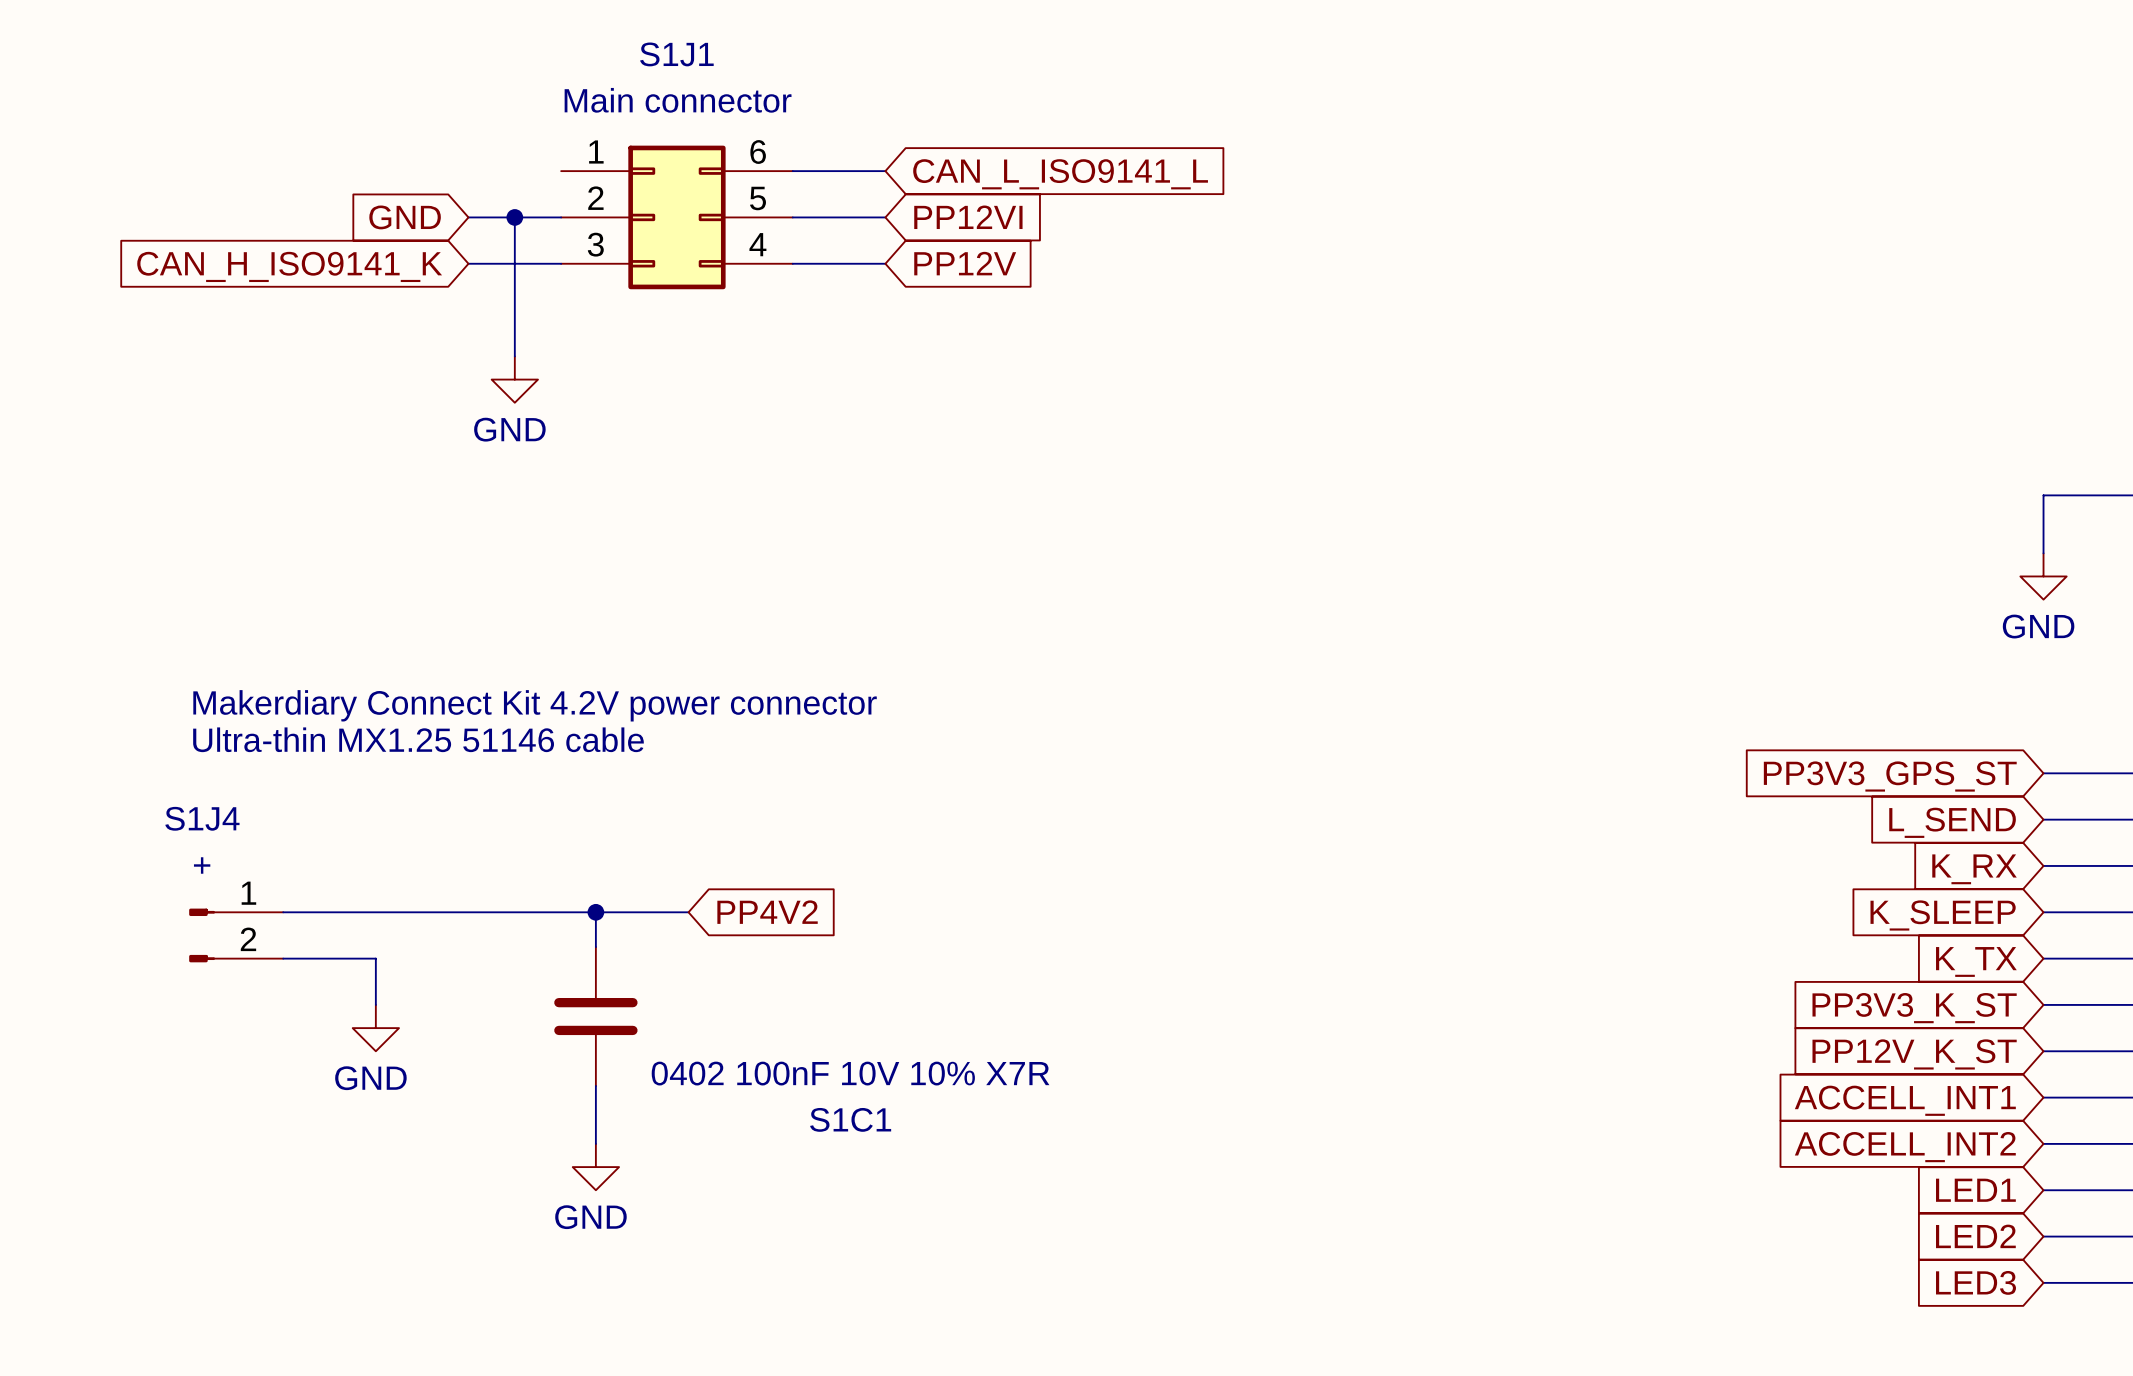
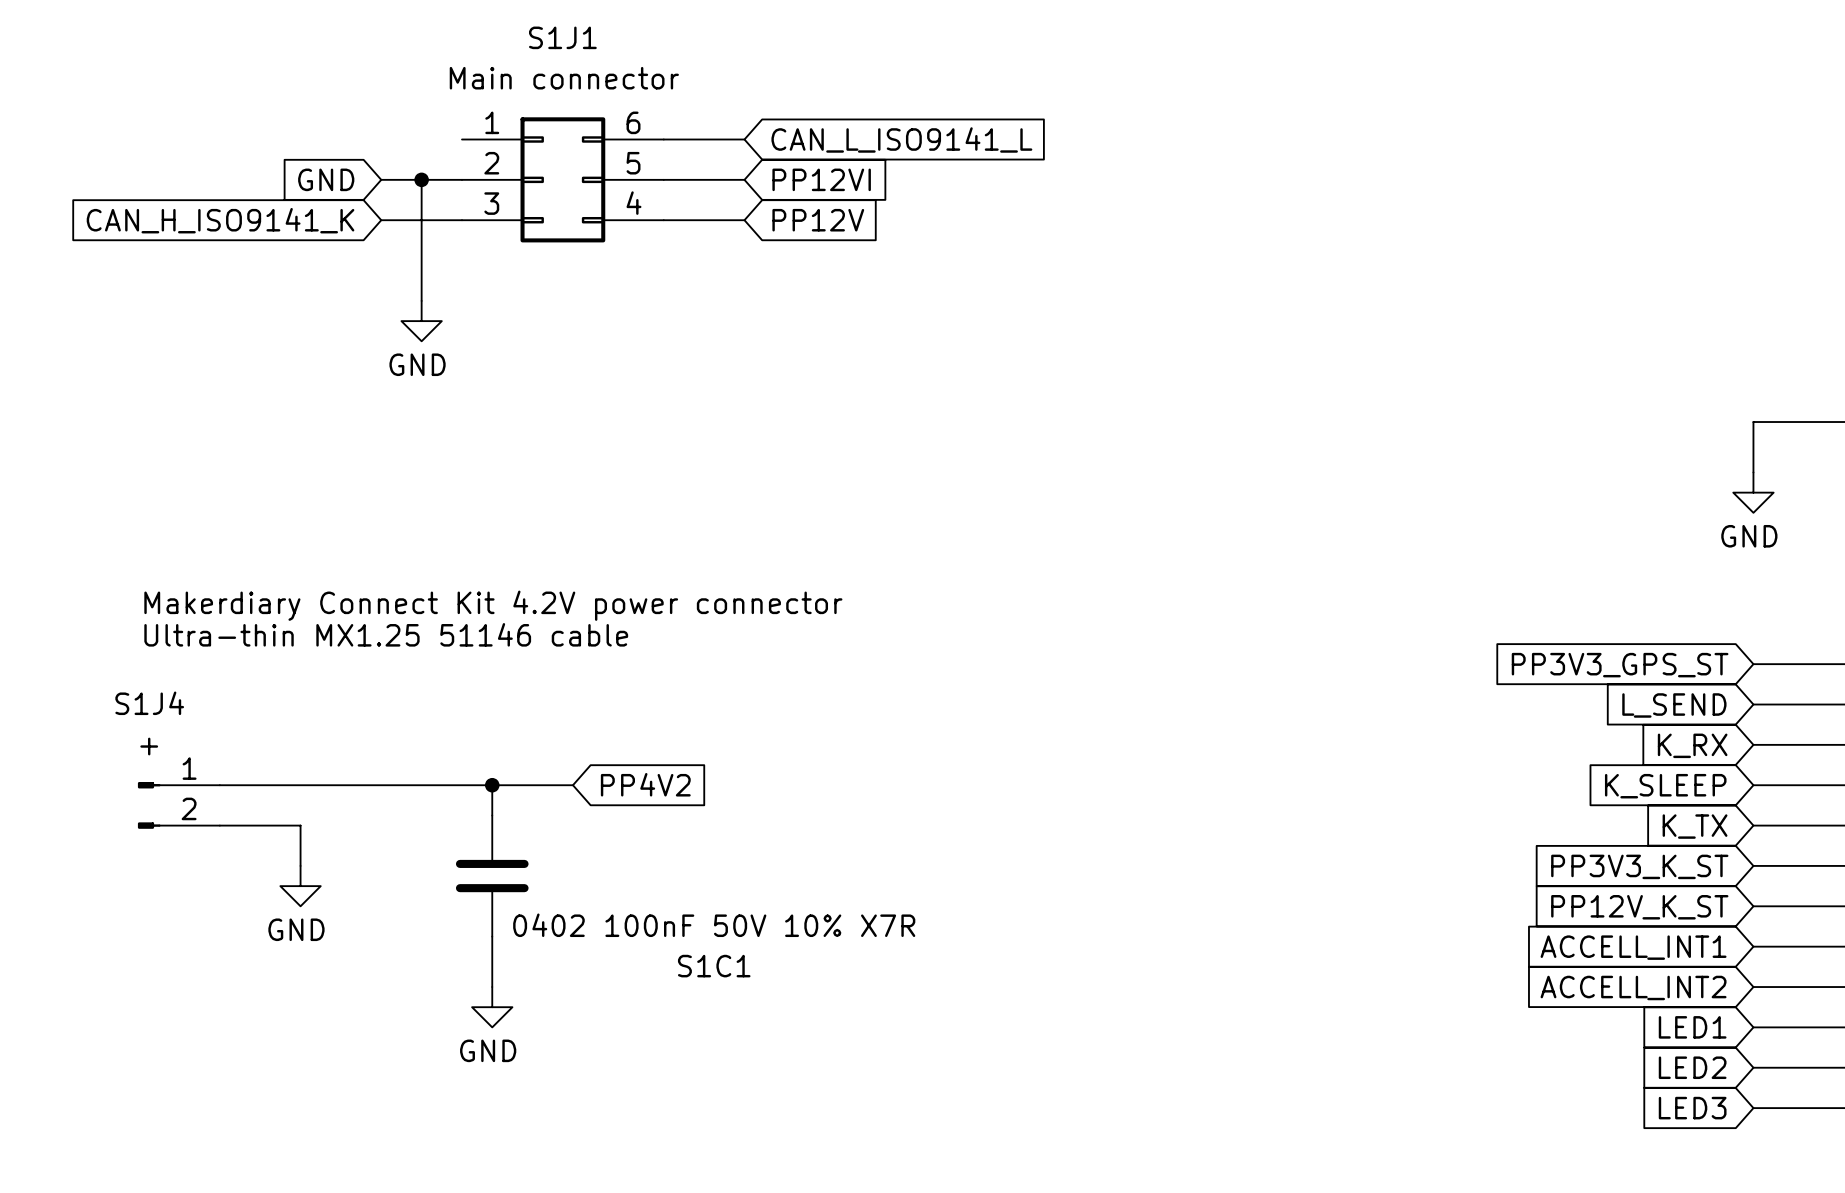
S1C1 value: 0402 100nF 10V 10% X7R (850, 1073) -> 0402 100nF 50V 10% X7R (714, 925)

